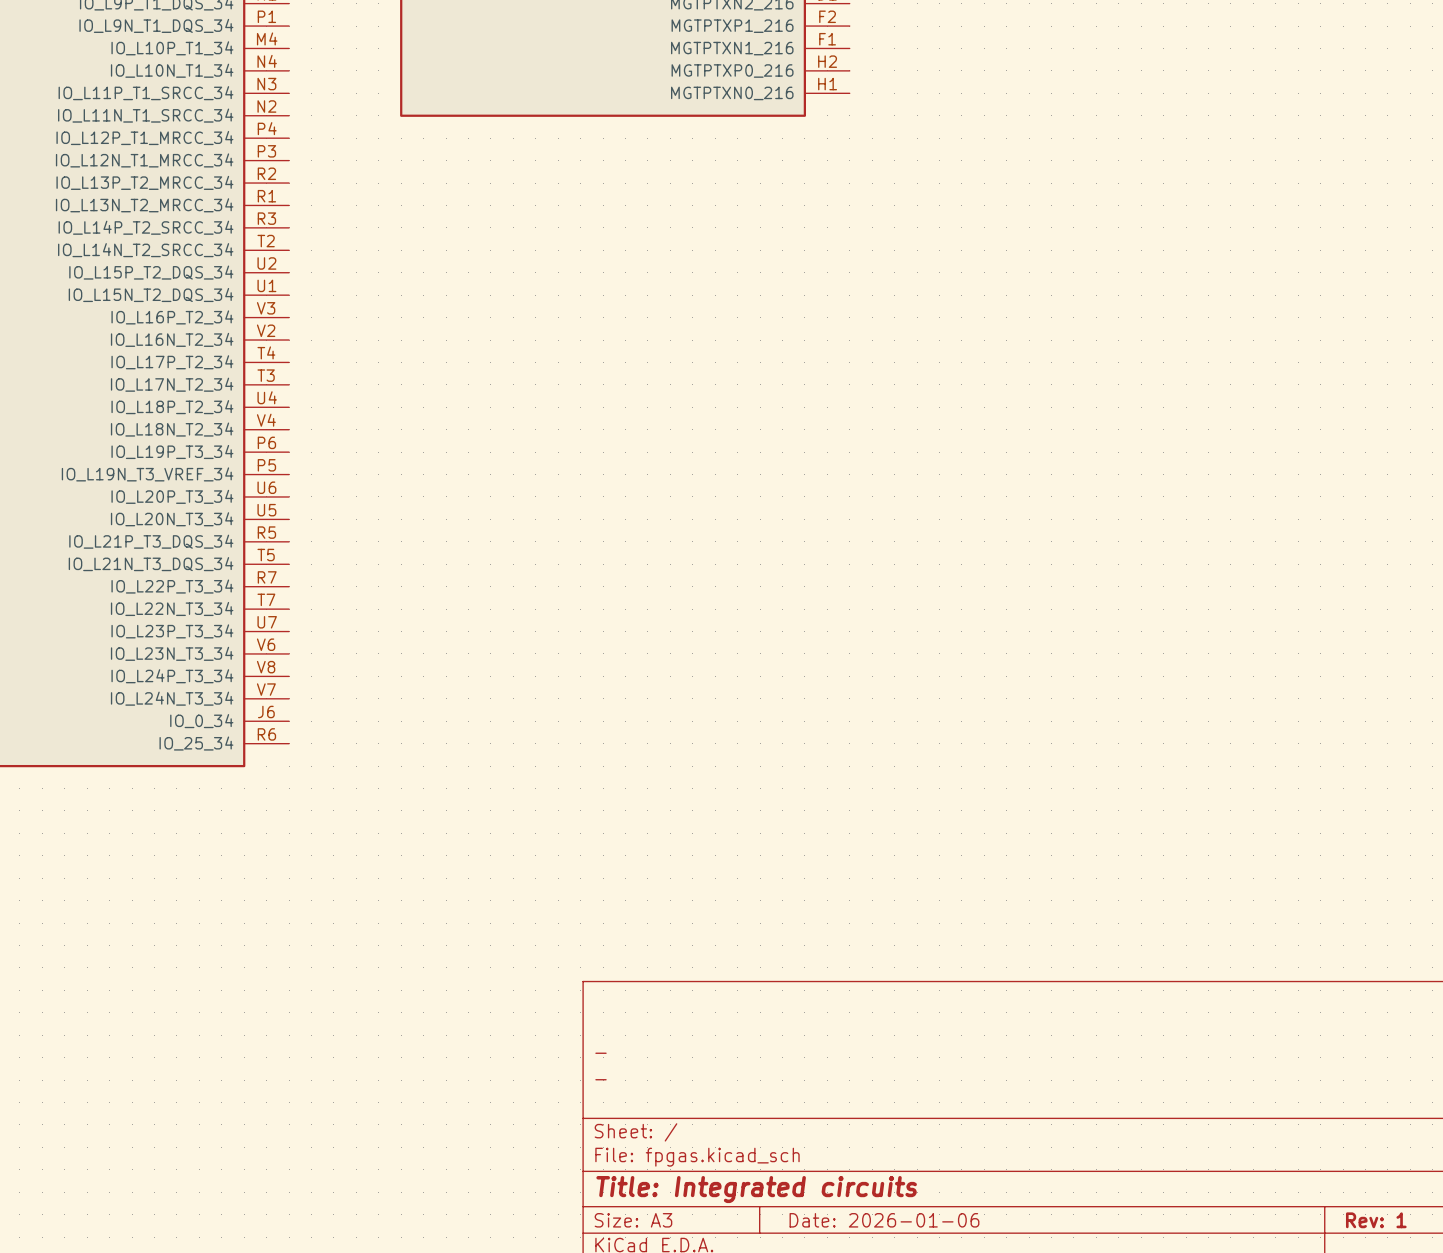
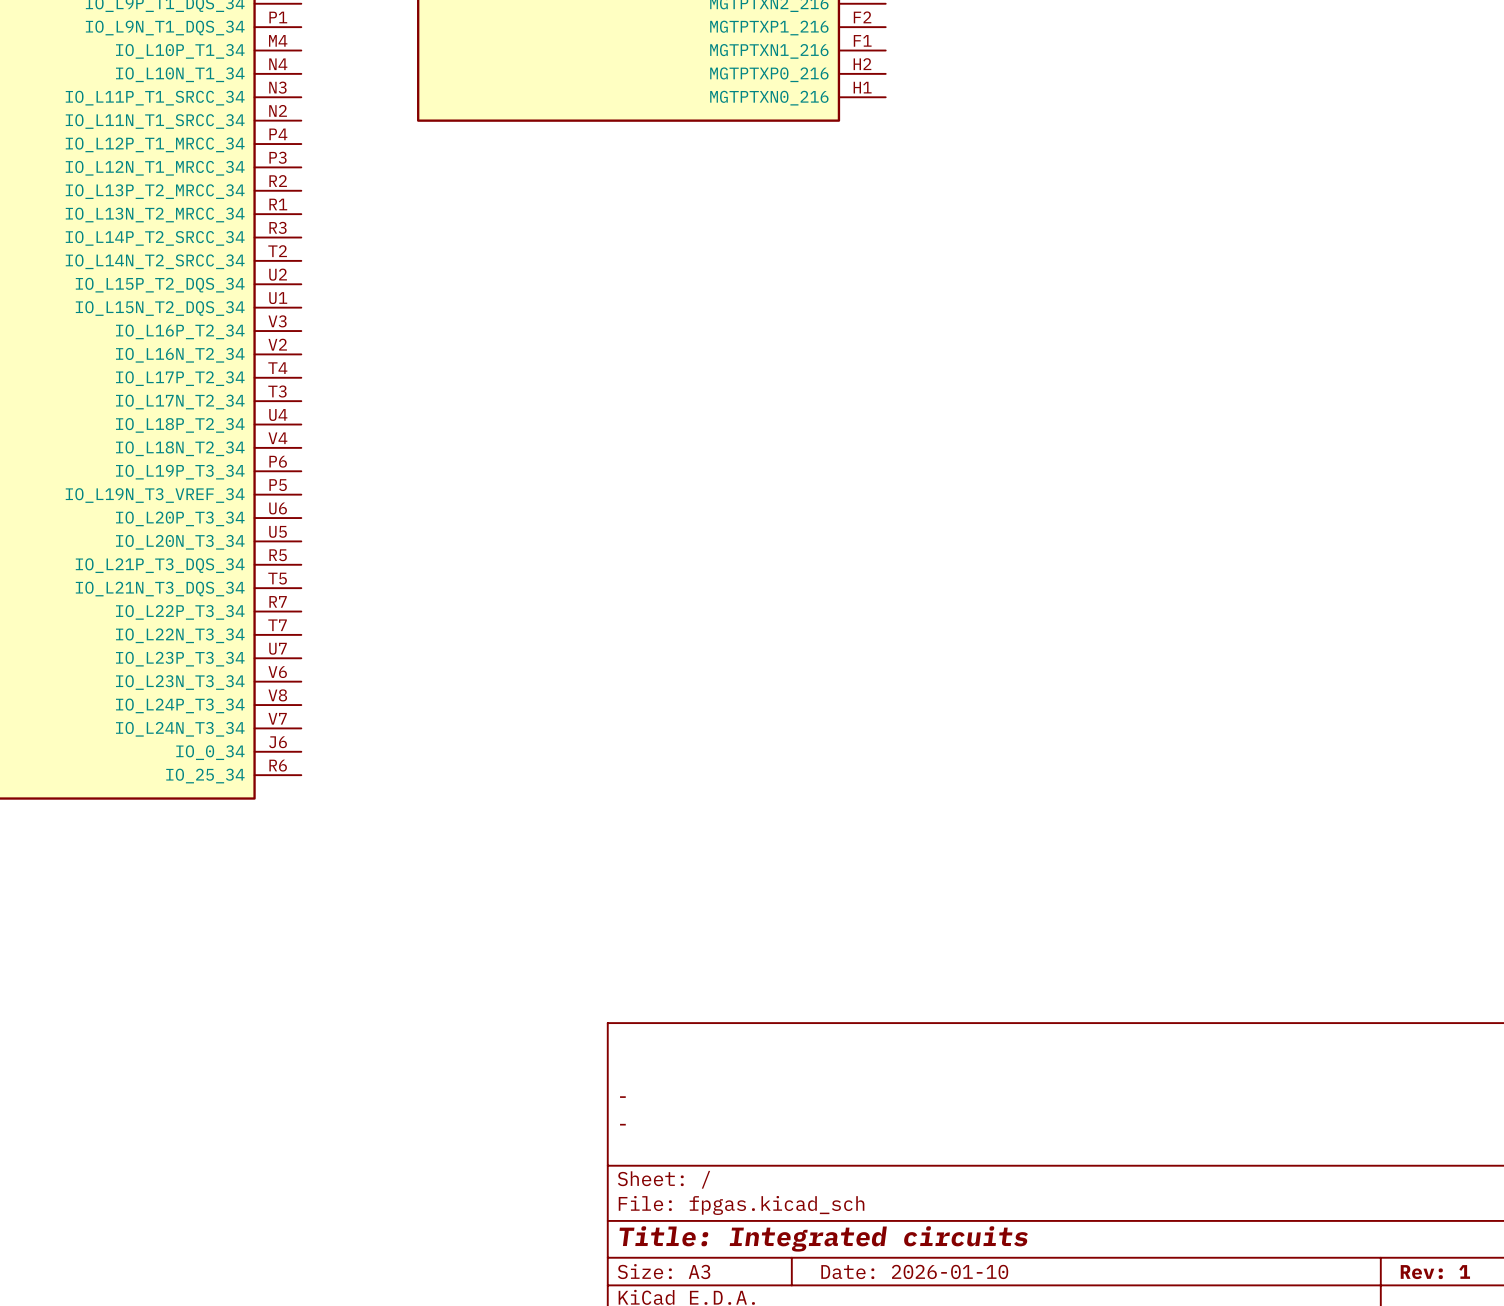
title block: Date: 2026-01-06 (884, 1220) -> Date: 2026-01-10 (914, 1271)

